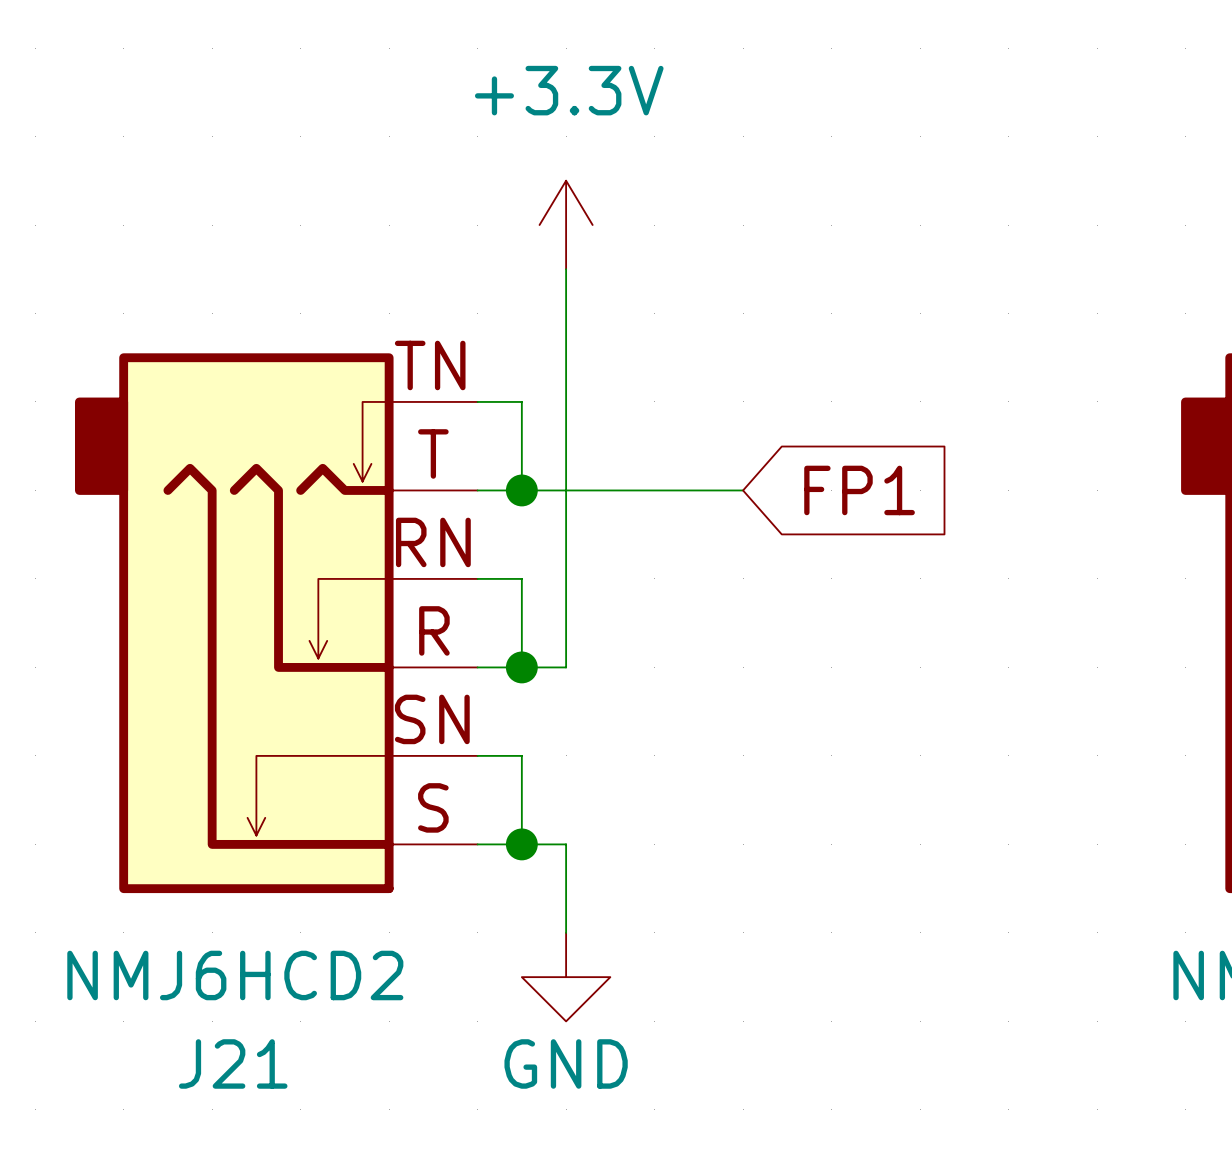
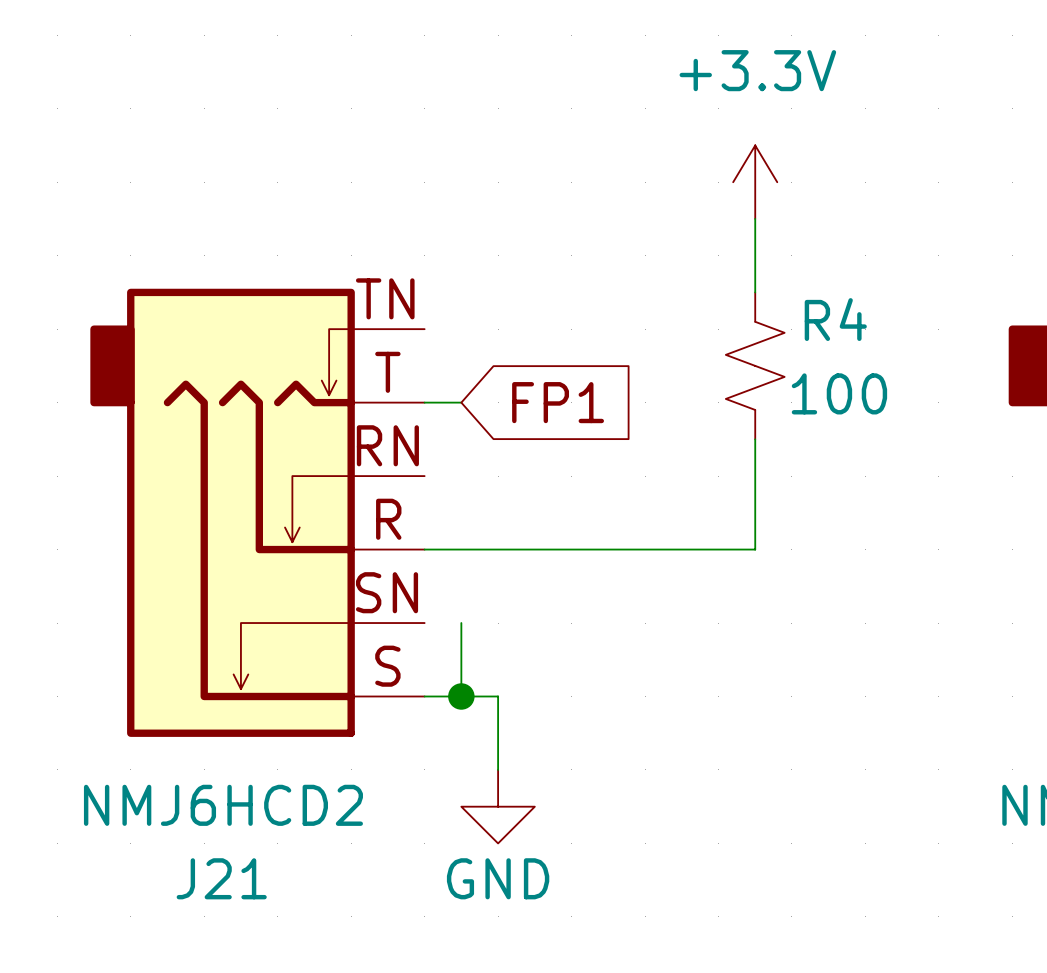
power symbol position: +3.3V (566, 225) -> +3.3V (755, 182)
wire: (566, 269) (566, 667) -> (755, 439) (755, 549) (498, 549)
wire: none -> (755, 218) (755, 292)
wire: (477, 401) (521, 401) (521, 490) (743, 490) -> none
R4: none -> 100 (755, 365)
junction: (521, 490) -> none
global label position: FP1 (859, 490) -> FP1 (558, 402)
wire: (477, 578) (521, 578) (521, 667) -> none
junction: (521, 667) -> none
wire: (477, 755) (521, 755) -> none

